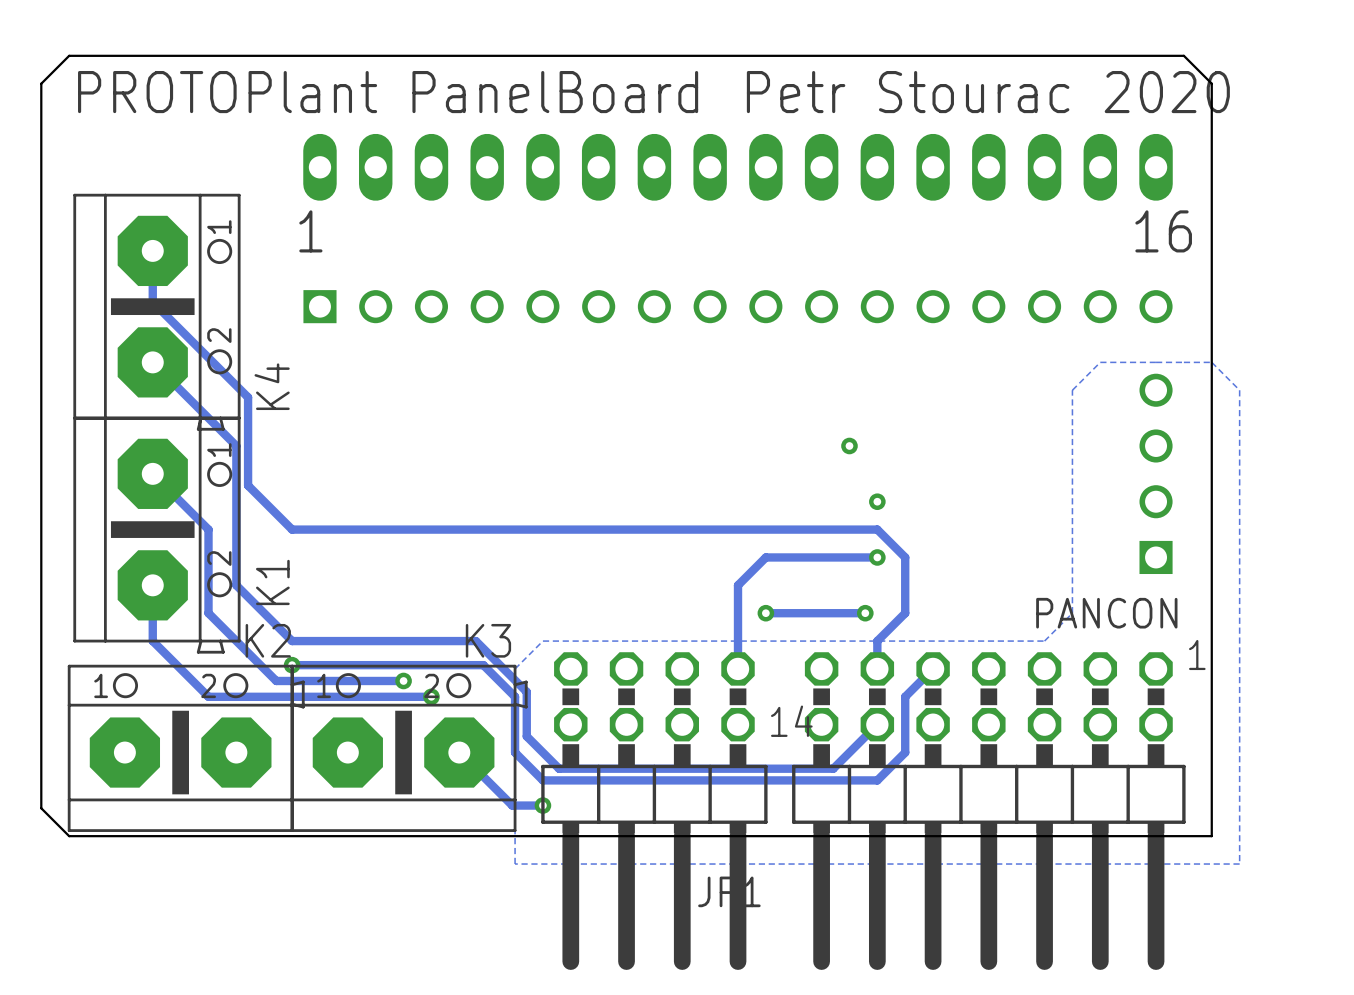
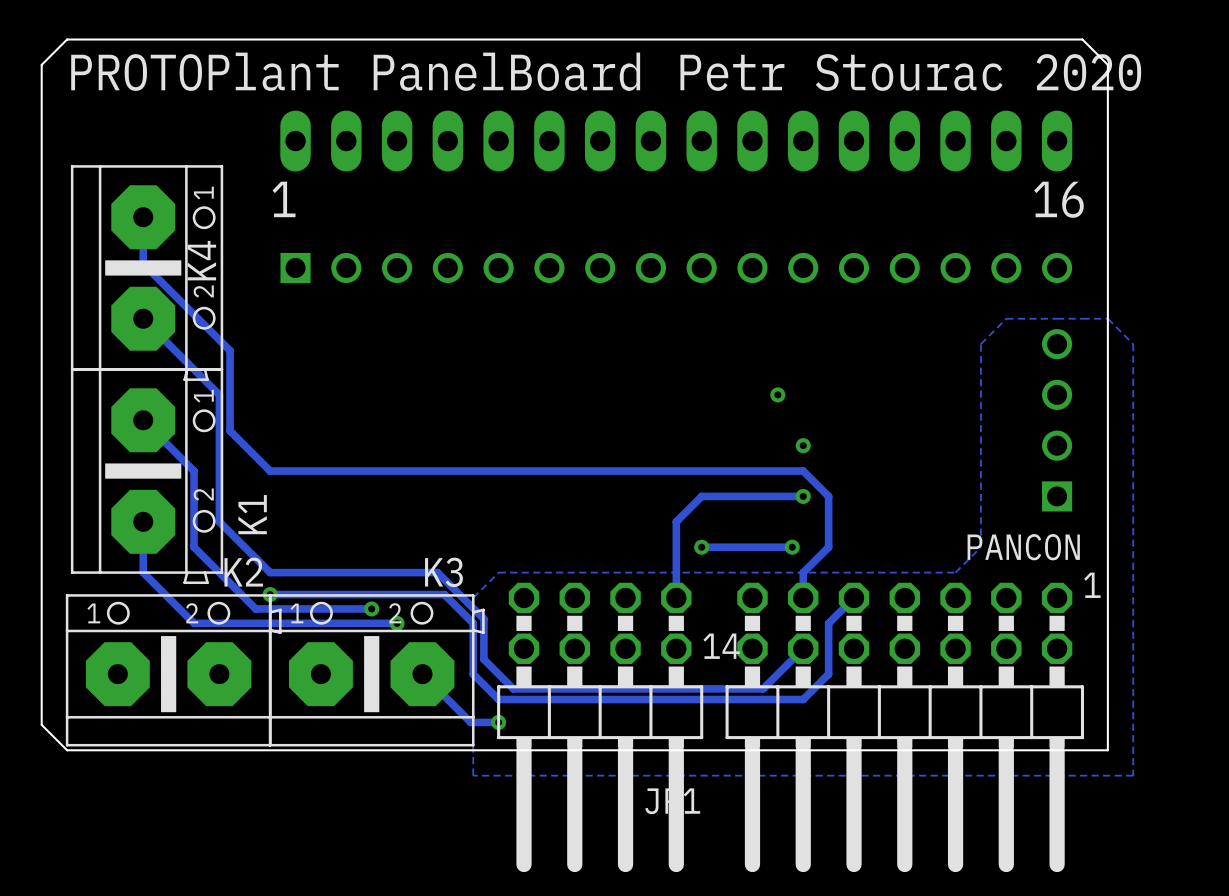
K4 name position: K4 (272, 386) -> K4 (201, 260)

